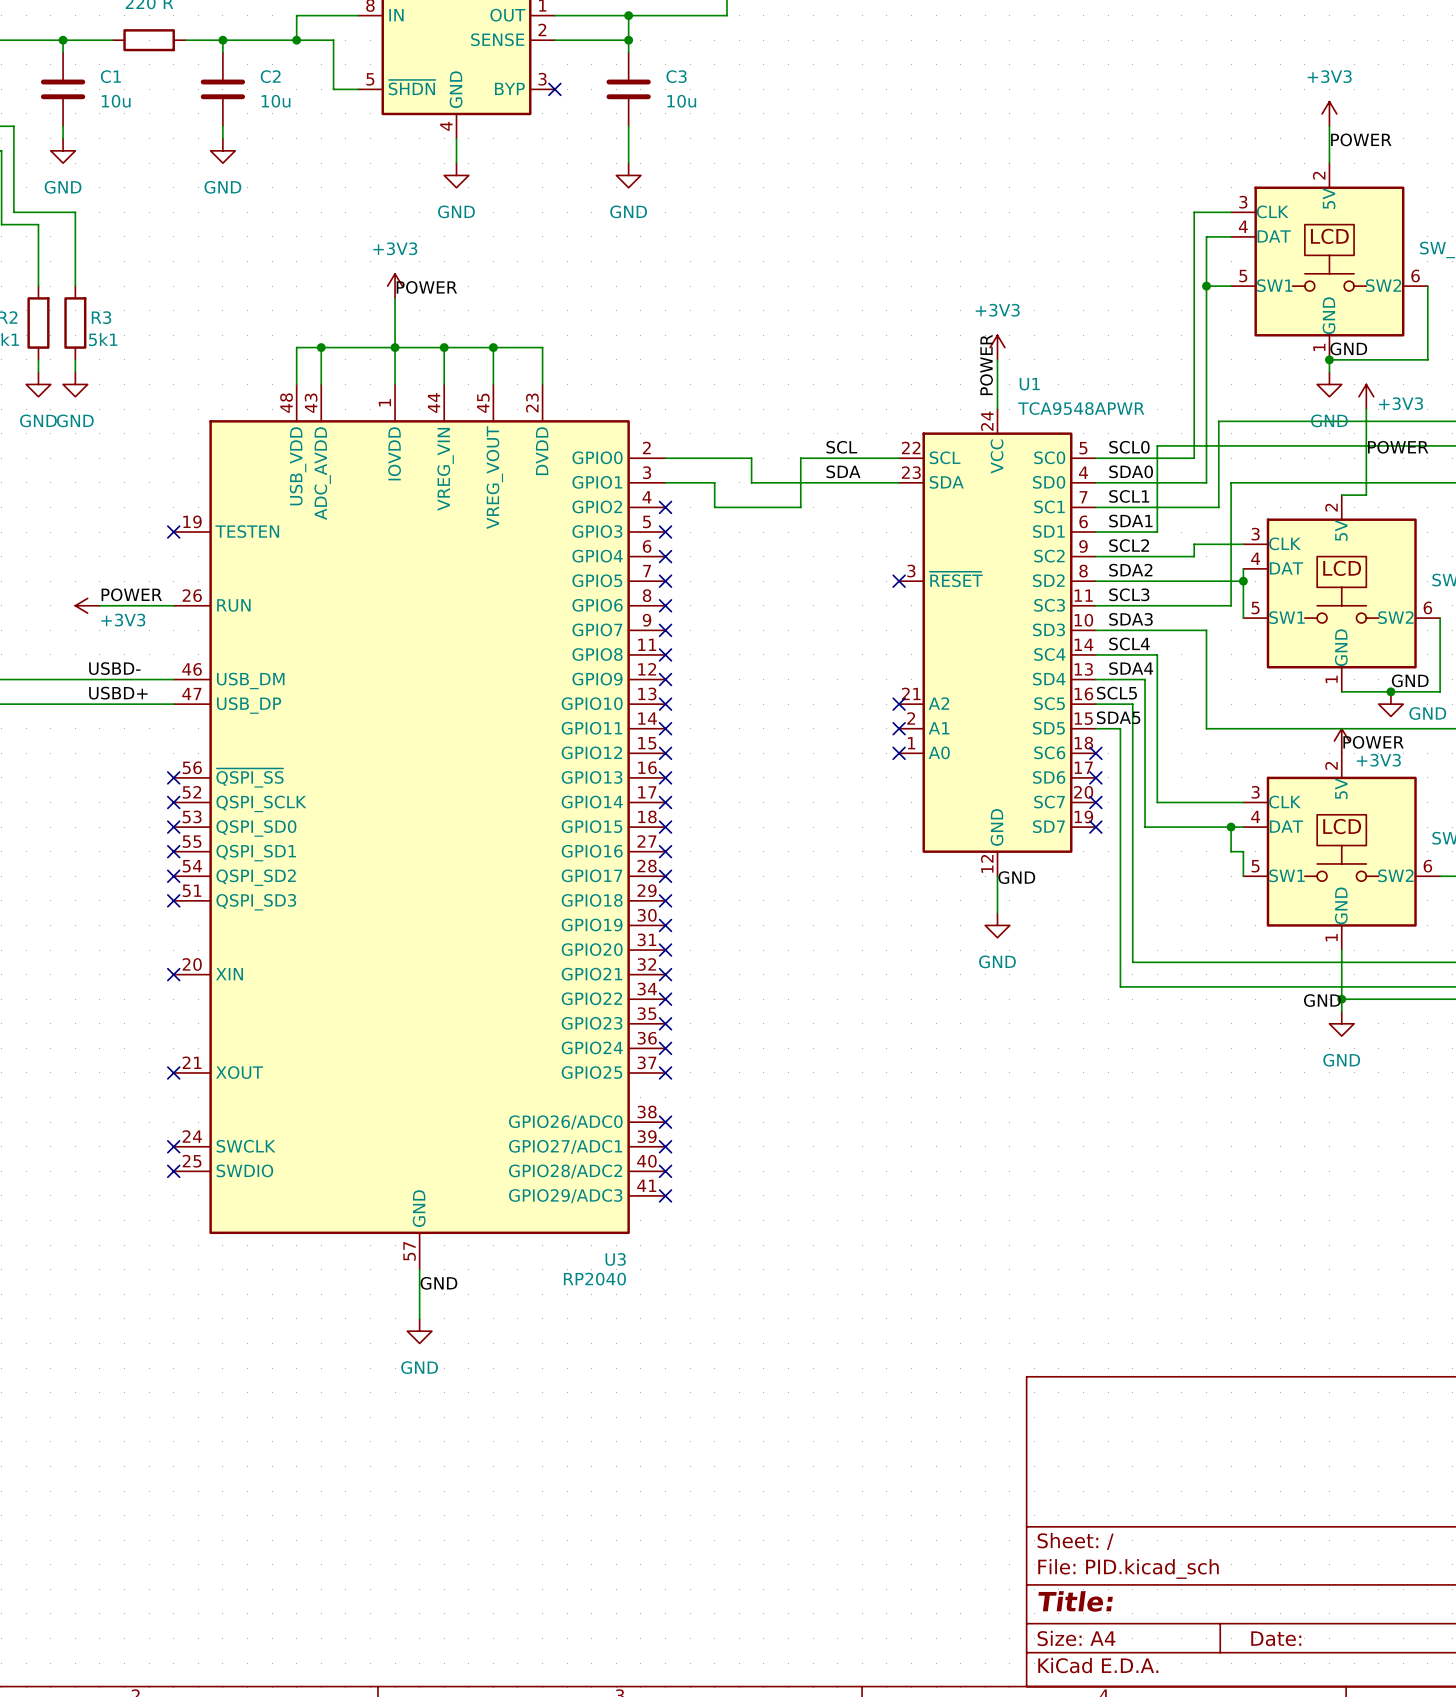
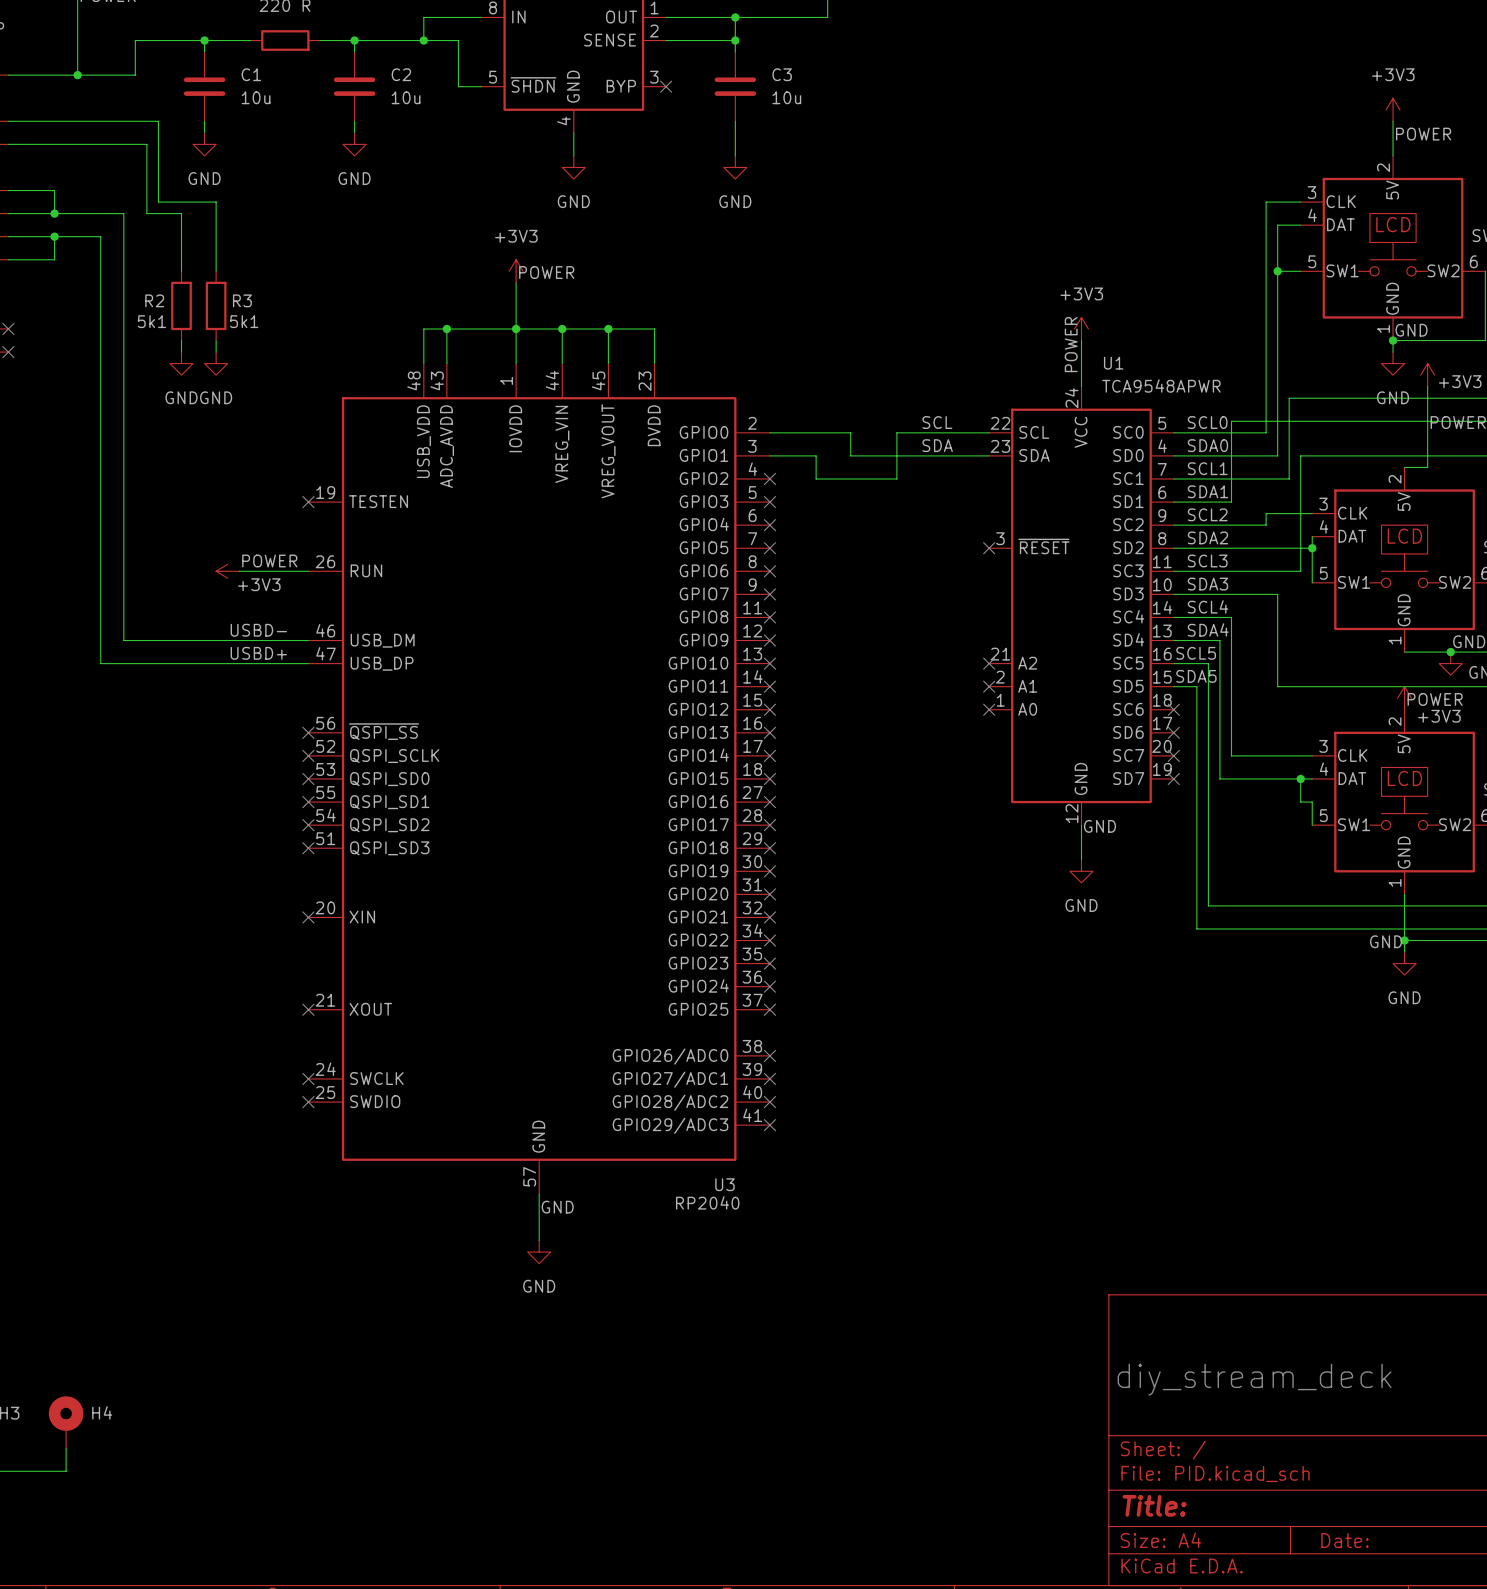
text: none -> diy_stream_deck (1254, 1379)

